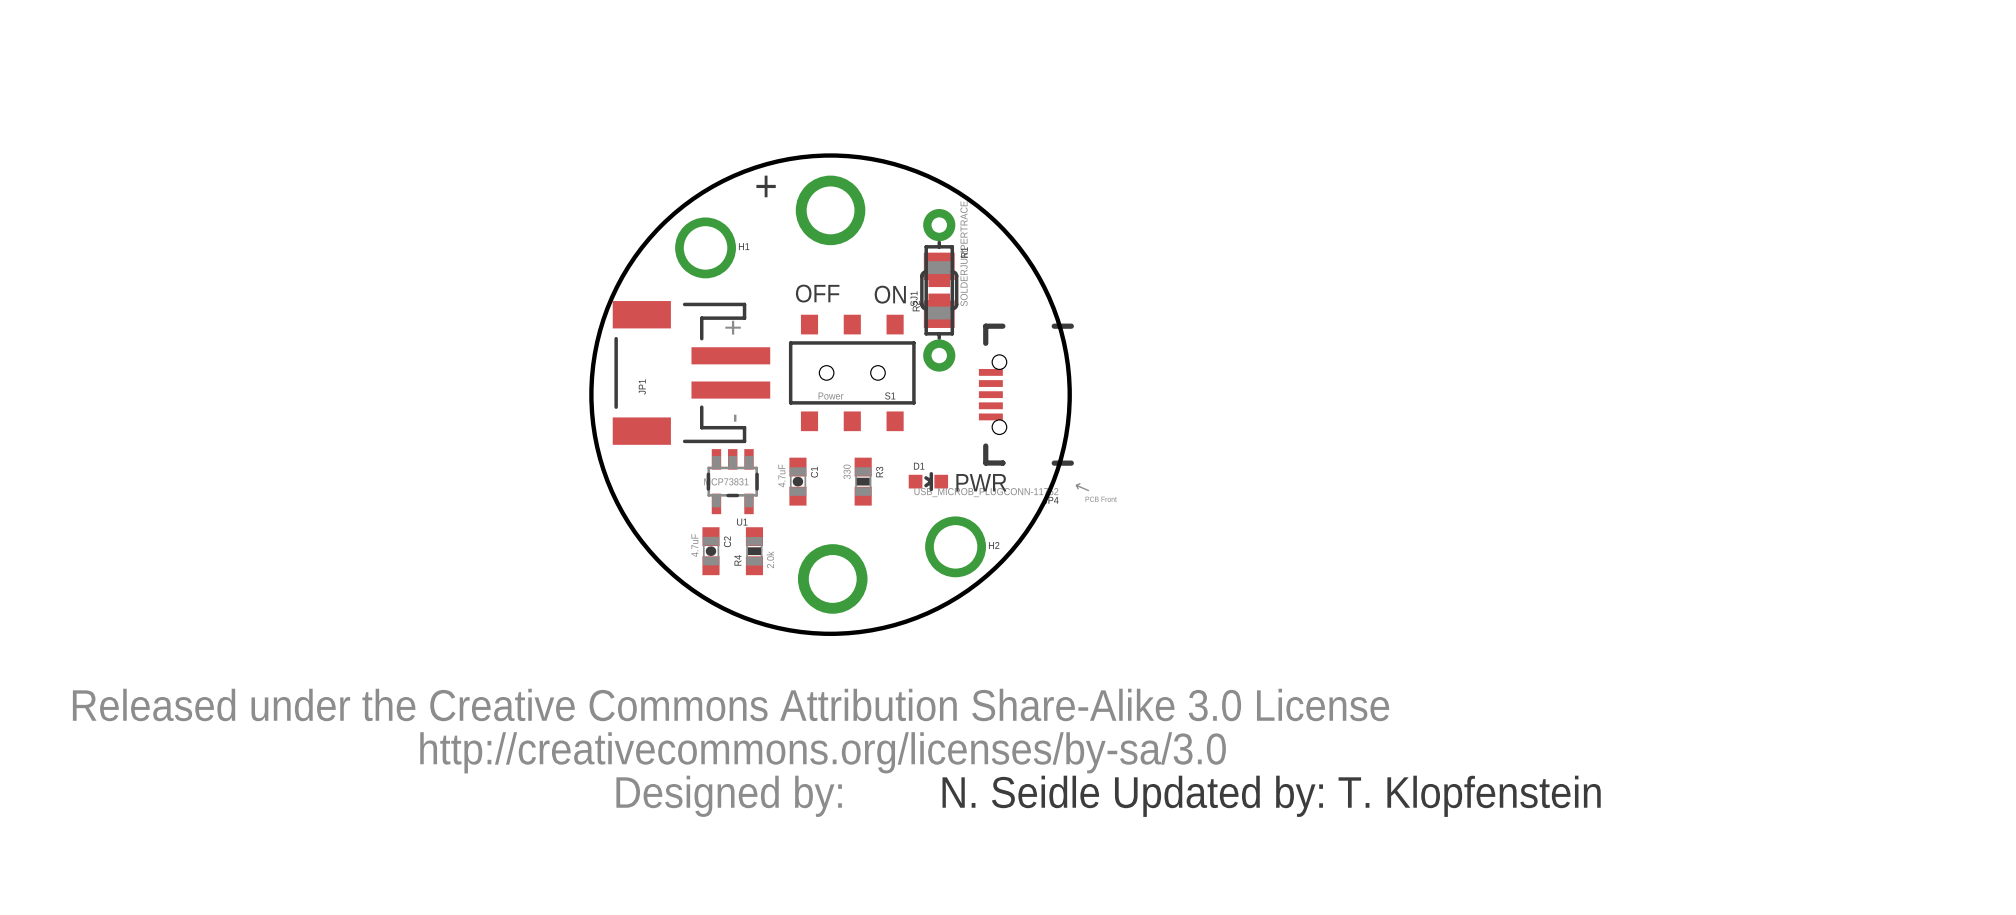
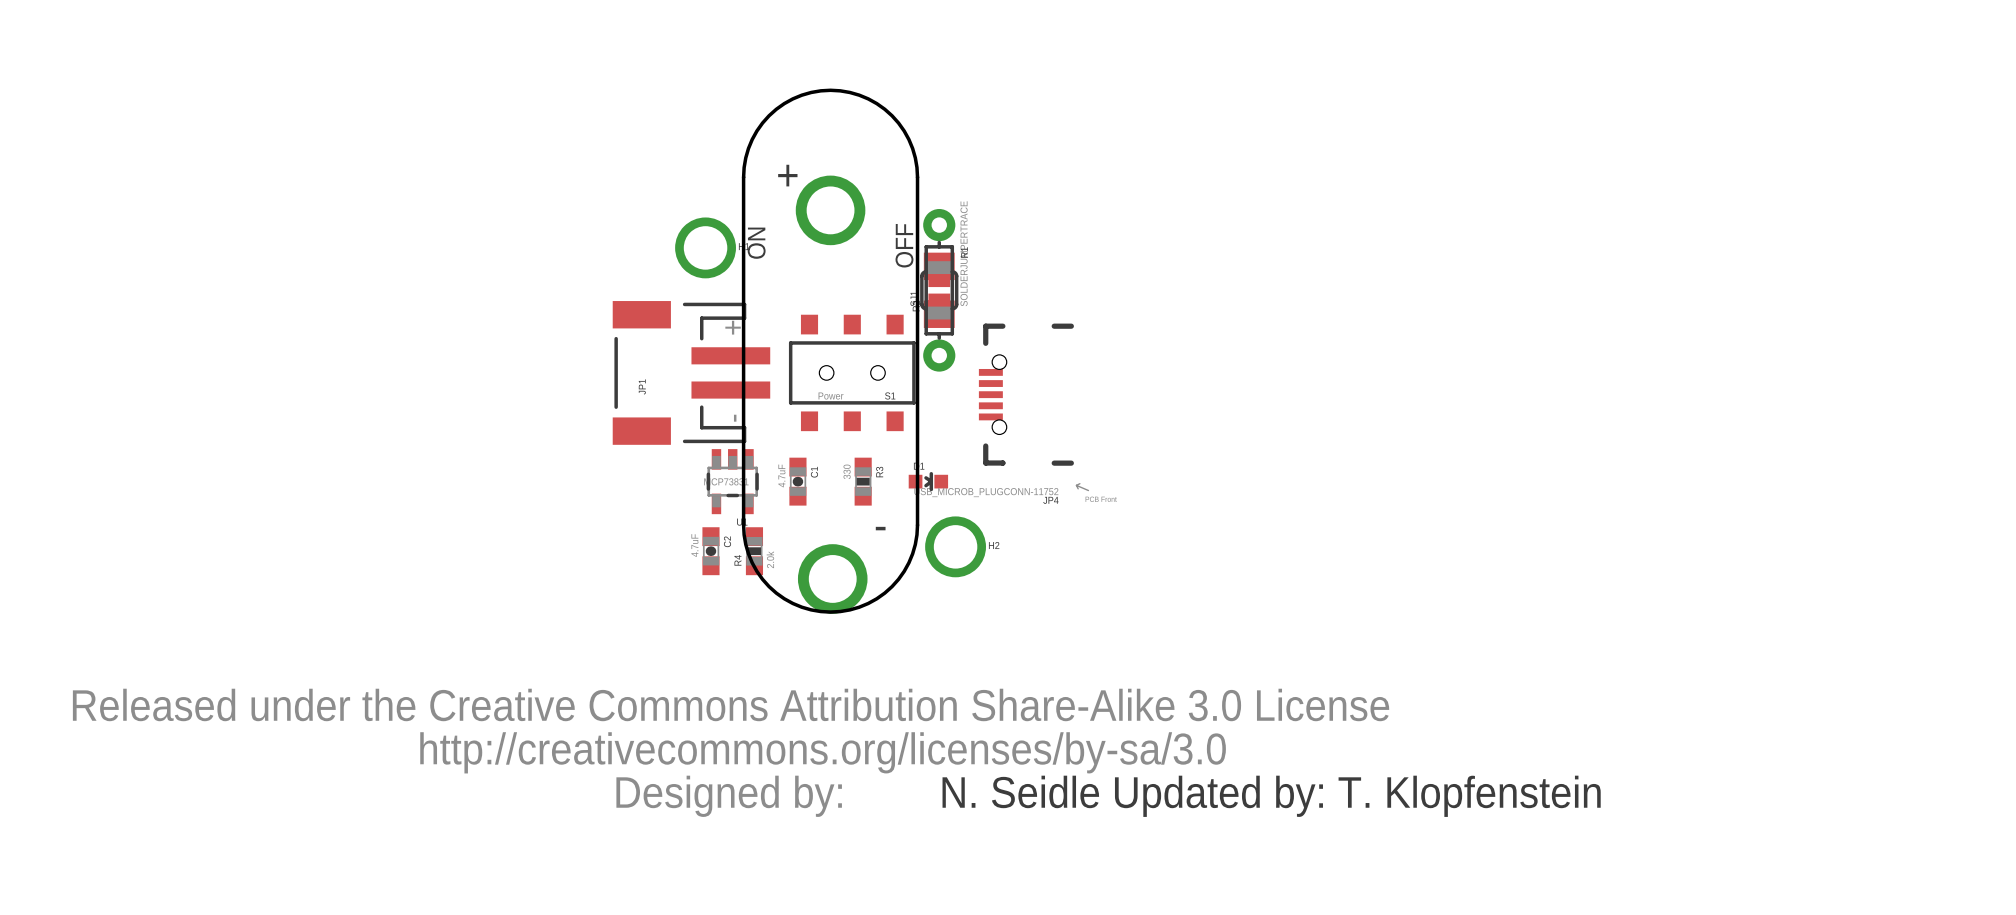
round board edge: [589, 153, 1072, 636] -> none
board edge: none -> (743, 177) (743, 525) (745, 544) (756, 571) (769, 586) (784, 598) (801, 607) (820, 611) (849, 609) (876, 598) (892, 586) (908, 562) (916, 534) (917, 177) (915, 157) (904, 130) (892, 115) (876, 103) (849, 92) (820, 90) (792, 98) (769, 115) (752, 139) (745, 157) (743, 177)
text position: + (766, 186) -> + (787, 175)
text rotation: 0° (817, 293) -> 90° counterclockwise (904, 245)
text position: OFF (817, 293) -> OFF (904, 245)
text rotation: 0° (890, 294) -> 90° counterclockwise (756, 243)
text position: ON (890, 294) -> ON (756, 243)
text: PWR (981, 482) -> none
text: none -> - (880, 528)

